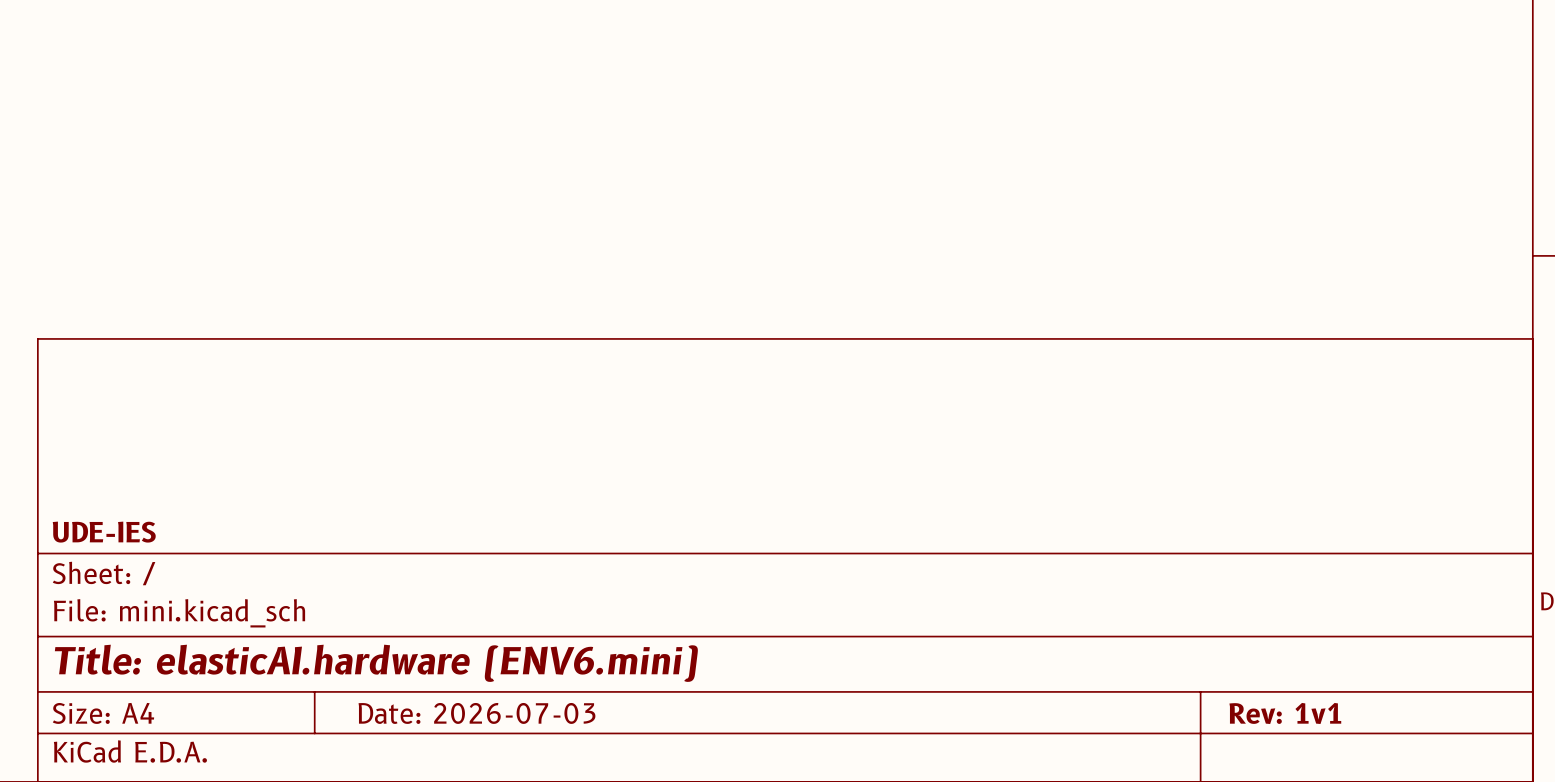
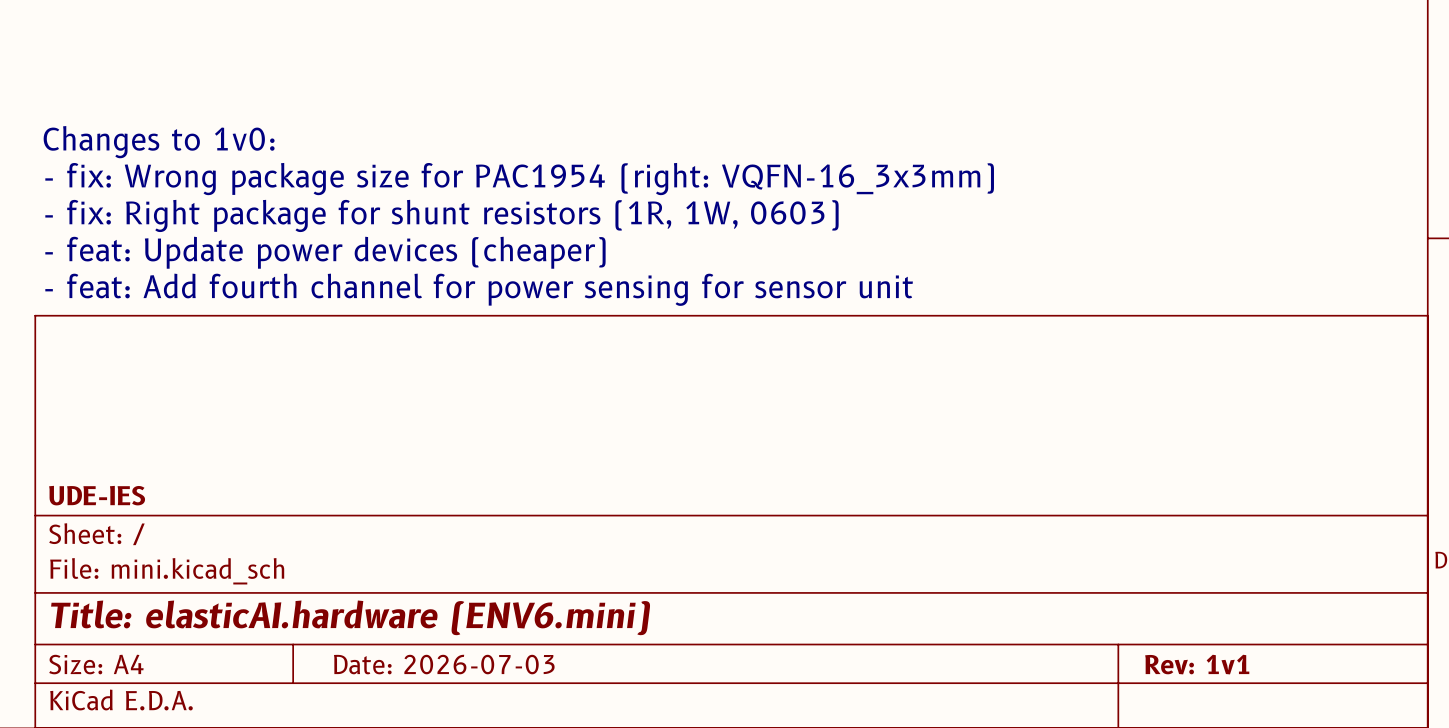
text: none -> Changes to 1v0: (159, 142)
text: none -> - fix: Wrong package size for PAC1954 (right: VQFN-16_3x3mm) (519, 179)
text: none -> - fix: Right package for shunt resistors (1R, 1W, 0603) (441, 215)
text: none -> - feat: Update power devices (cheaper) (325, 252)
text: none -> - feat: Add fourth channel for power sensing for sensor unit (479, 289)

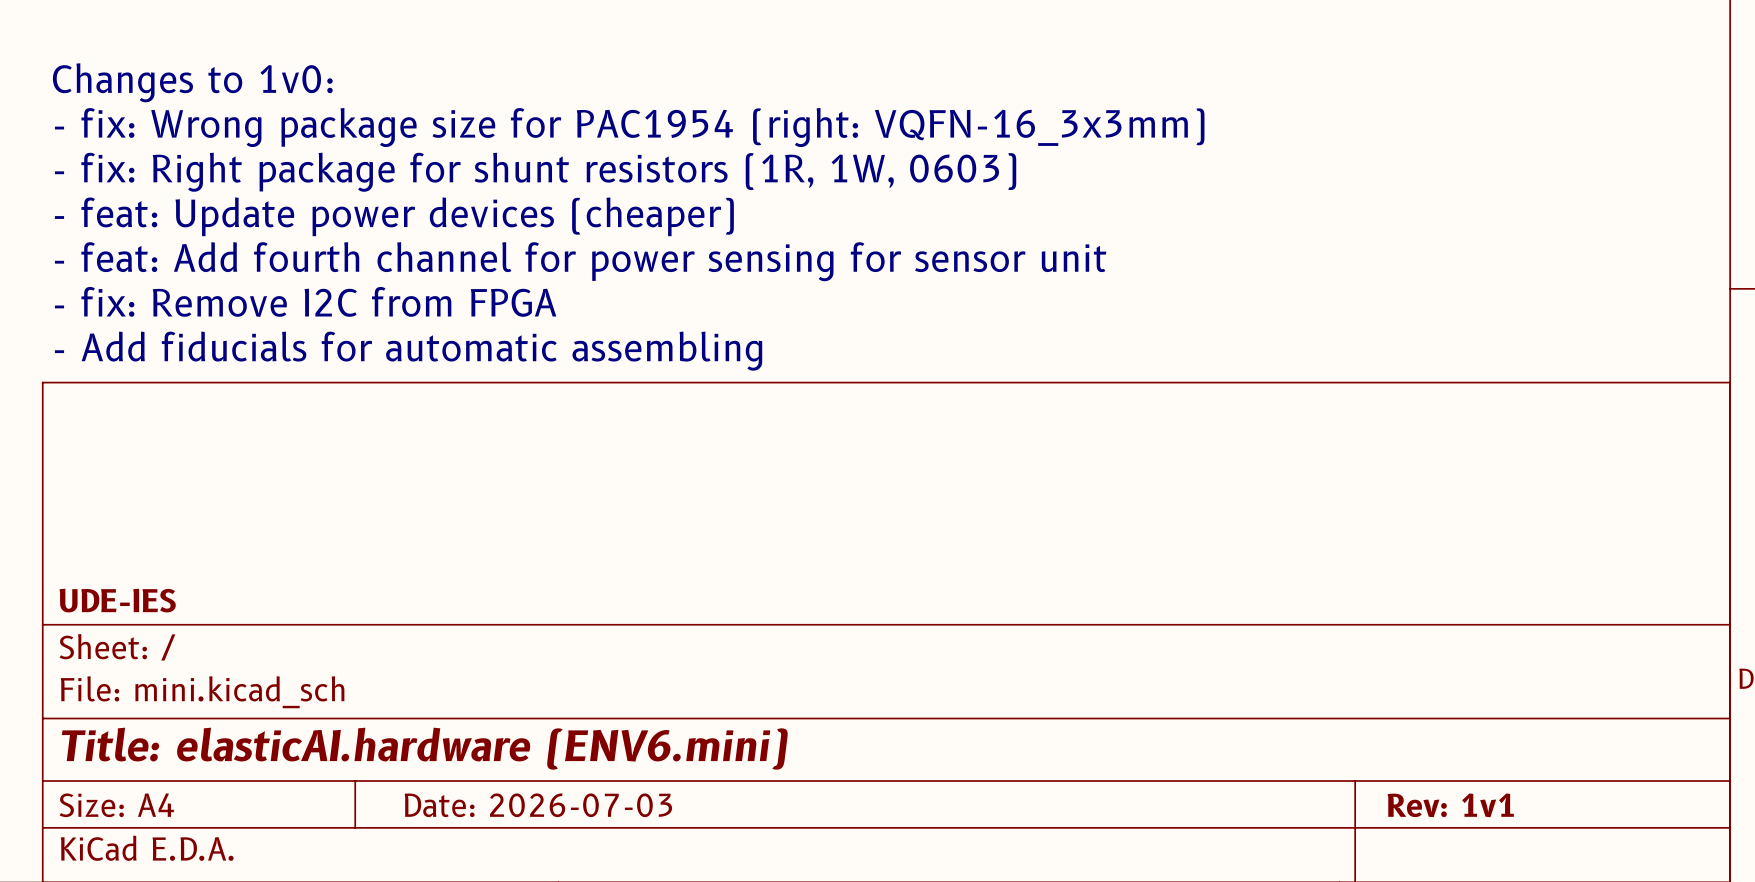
text: none -> Changes to 1v0: (192, 82)
text: none -> - fix: Wrong package size for PAC1954 (right: VQFN-16_3x3mm) (629, 127)
text: Changes to 1v0: (159, 142) -> - fix: Right package for shunt resistors (1R, 1W, 0603) (535, 172)
text: - fix: Wrong package size for PAC1954 (right: VQFN-16_3x3mm) (519, 179) -> - feat: Update power devices (cheaper) (394, 216)
text: - fix: Right package for shunt resistors (1R, 1W, 0603) (441, 215) -> - feat: Add fourth channel for power sensing for sensor unit (580, 261)
text: - feat: Update power devices (cheaper) (325, 252) -> - fix: Remove I2C from FPGA (305, 301)
text: - feat: Add fourth channel for power sensing for sensor unit (479, 289) -> - Add fiducials for automatic assembling (408, 351)

